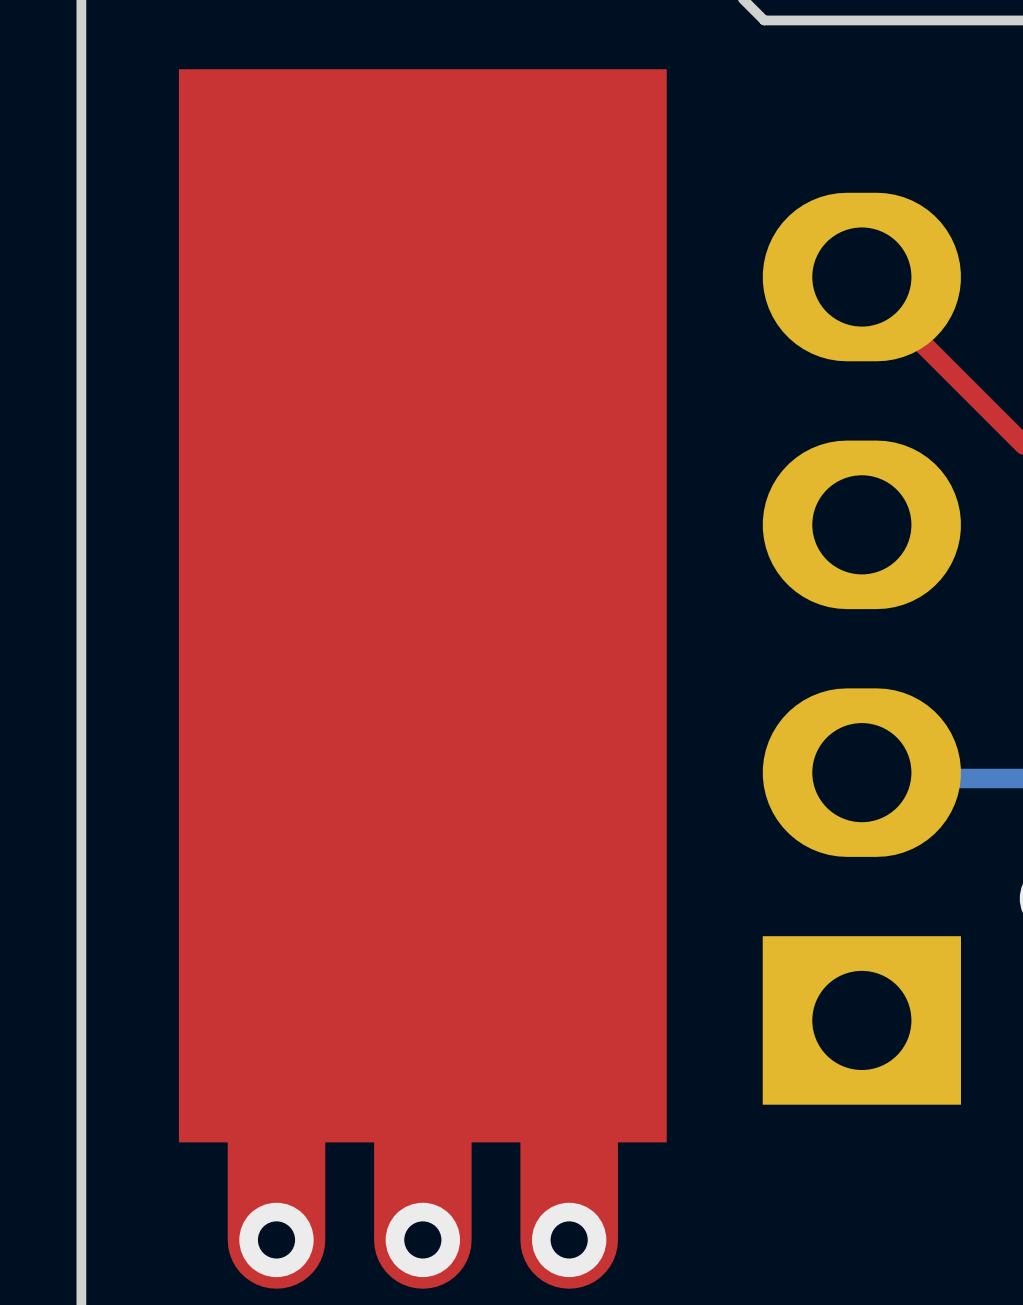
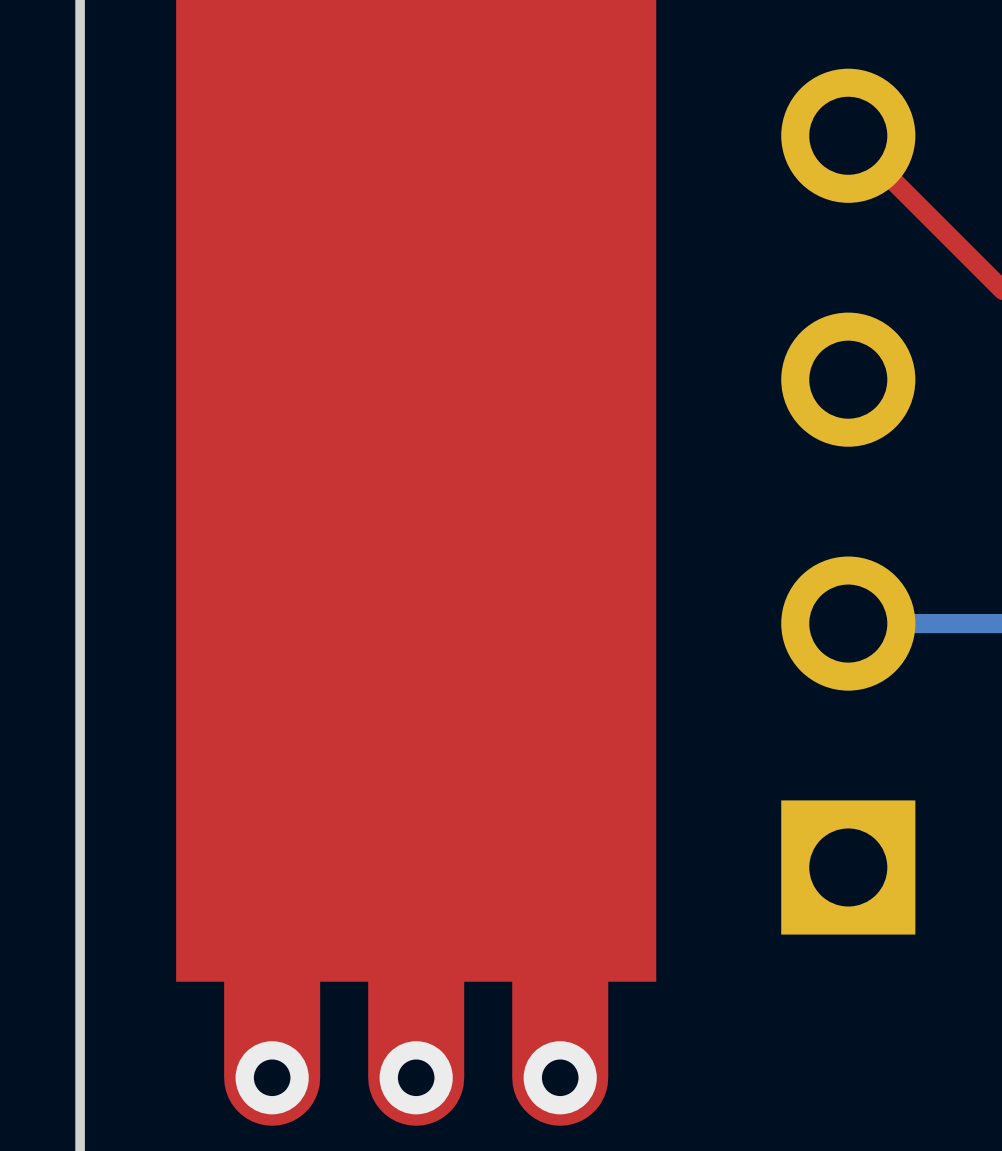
part footprint: [762, 192, 961, 1105] -> [781, 68, 916, 935]

